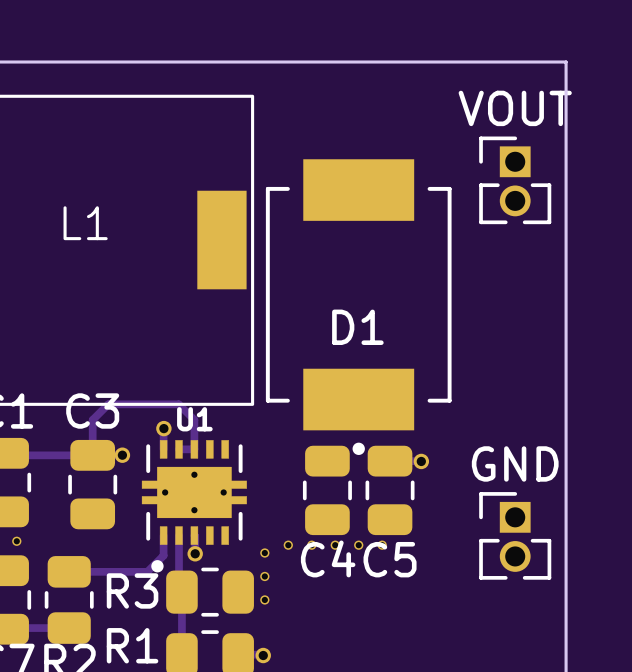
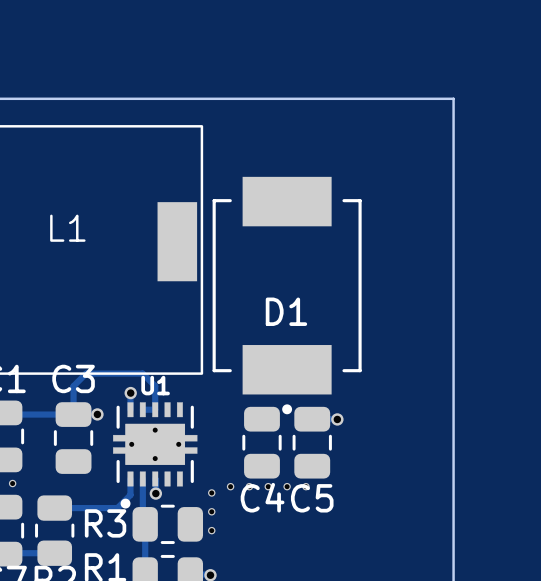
VOUT: (515, 180) -> none
GND: (515, 535) -> none

